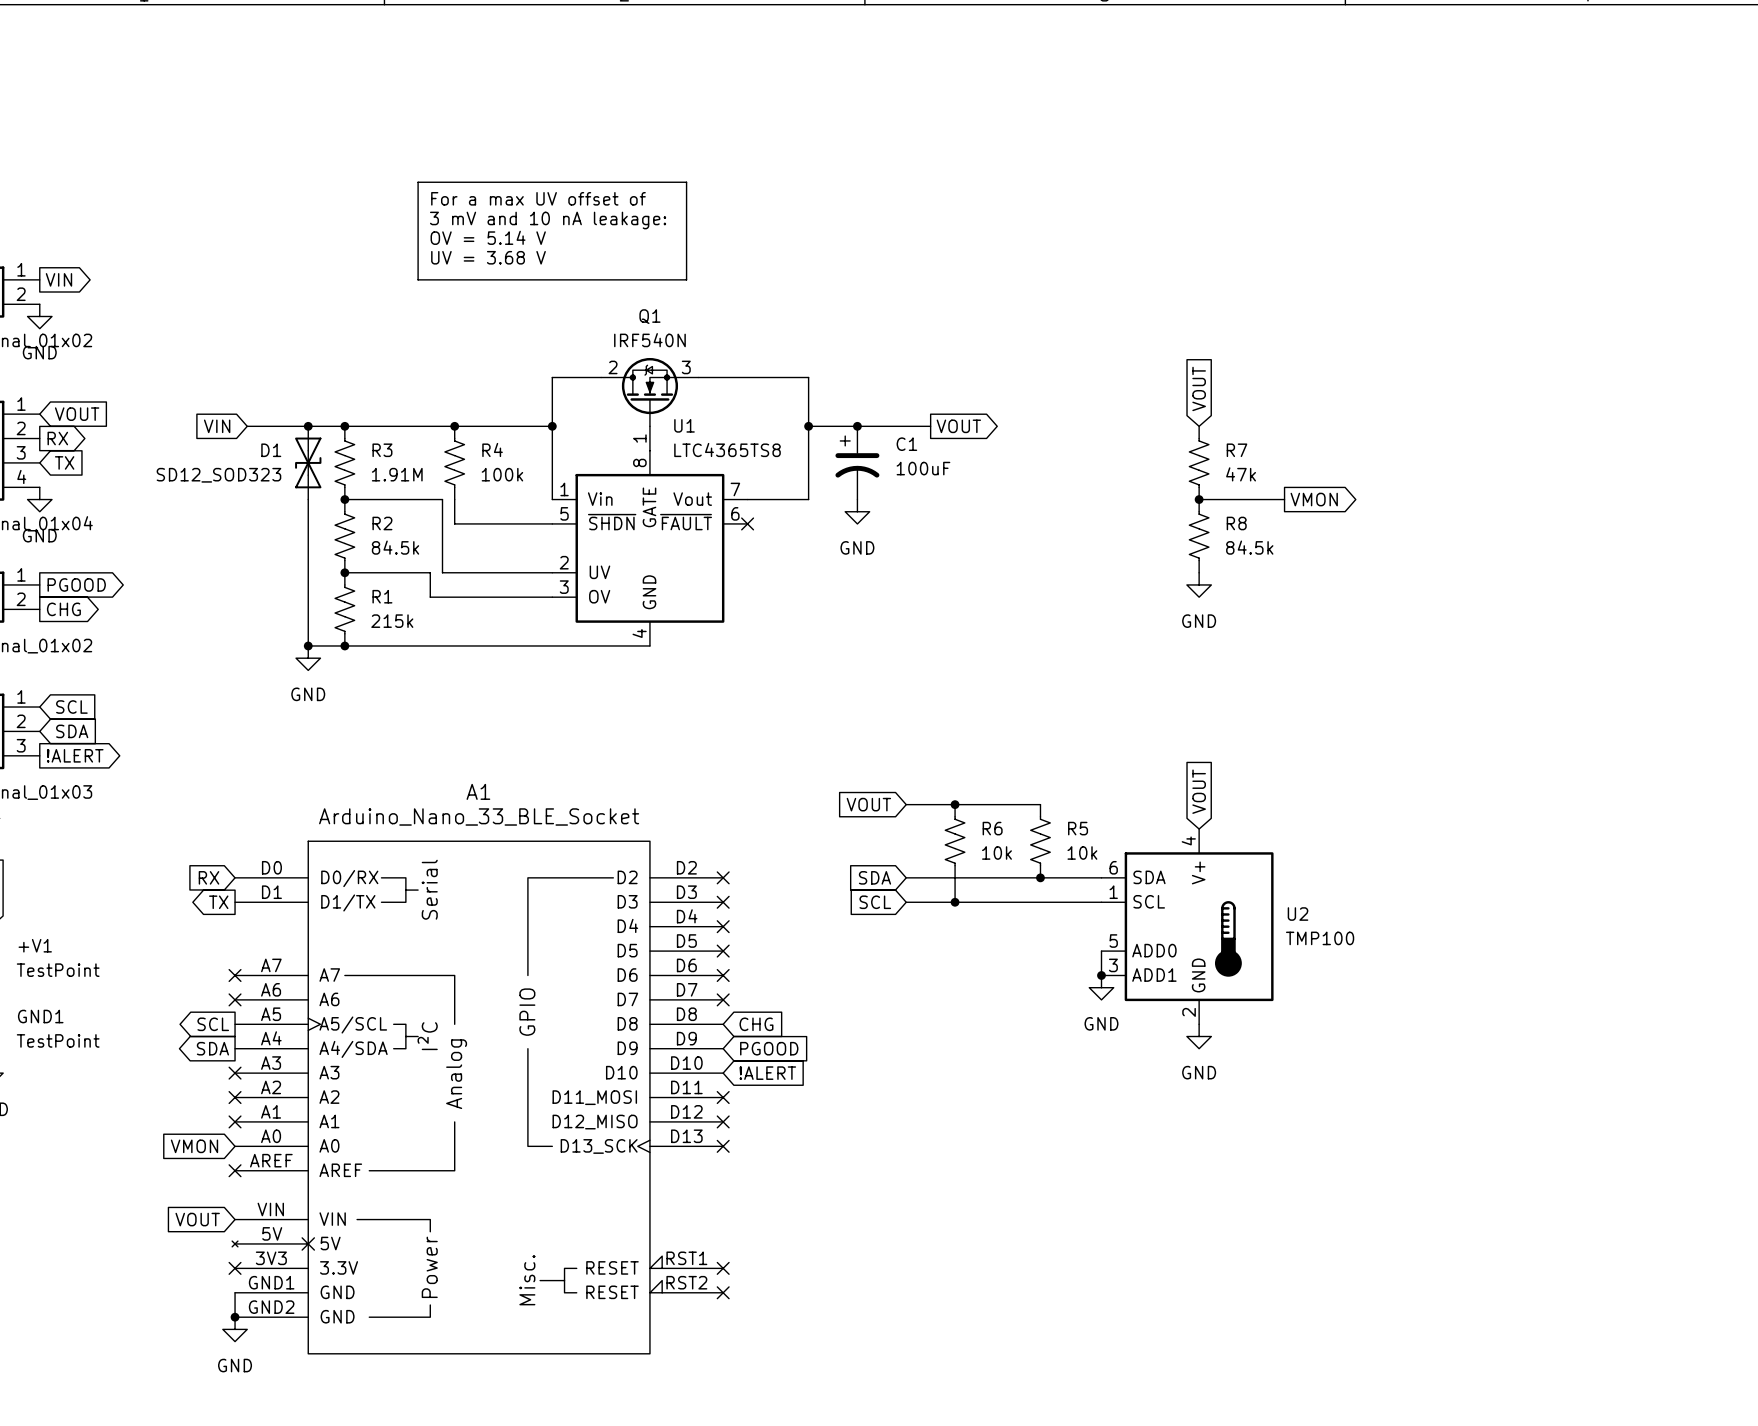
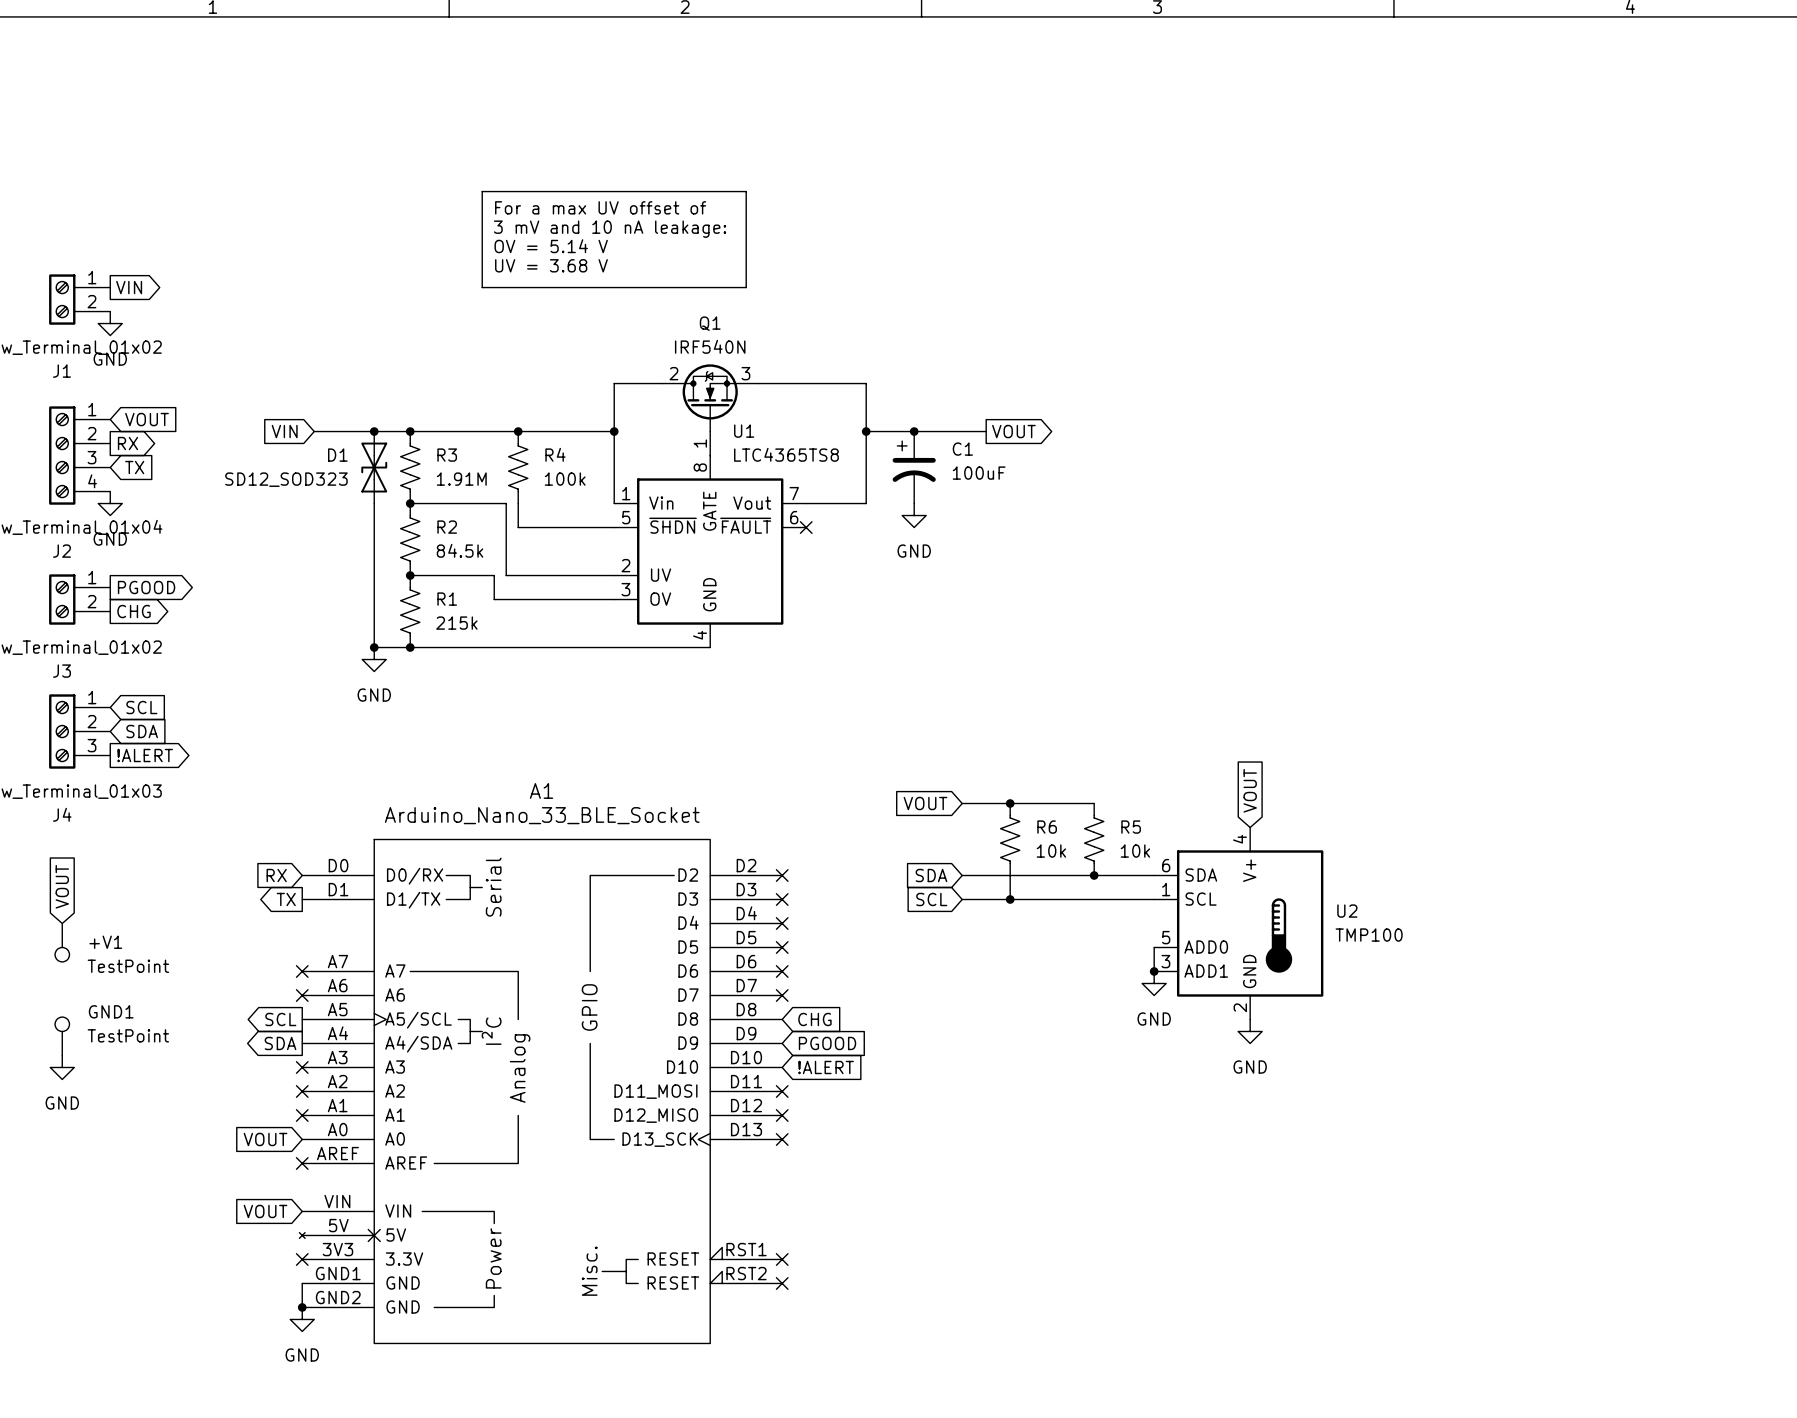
global label: VOUT (1199, 388) -> none
R7: 47k (1199, 462) -> none
wire: (1199, 499) (1284, 499) -> none
junction: (1199, 499) -> none
global label: VMON (1314, 499) -> none
R8: 84.5k (1199, 536) -> none
power symbol: GND (1199, 584) -> none
global label: VMON (194, 1146) -> VOUT (265, 1139)

